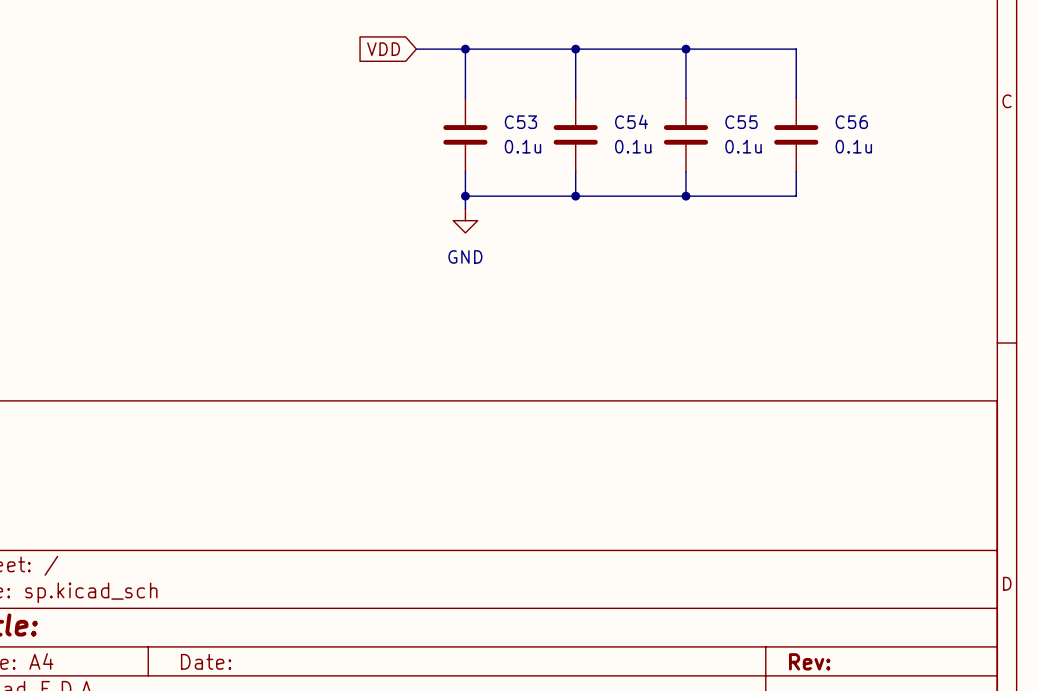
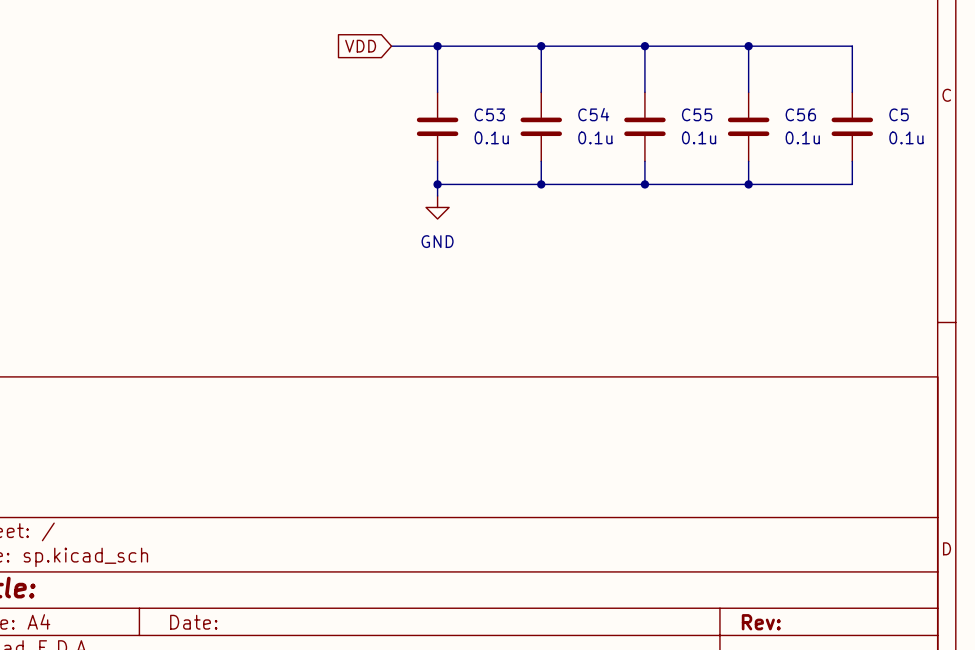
wire: none -> (748, 46) (852, 46) (852, 92)
junction: none -> (748, 46)
C5: none -> 0.1u (852, 126)
wire: none -> (852, 161) (852, 184) (748, 184)
junction: none -> (748, 184)

